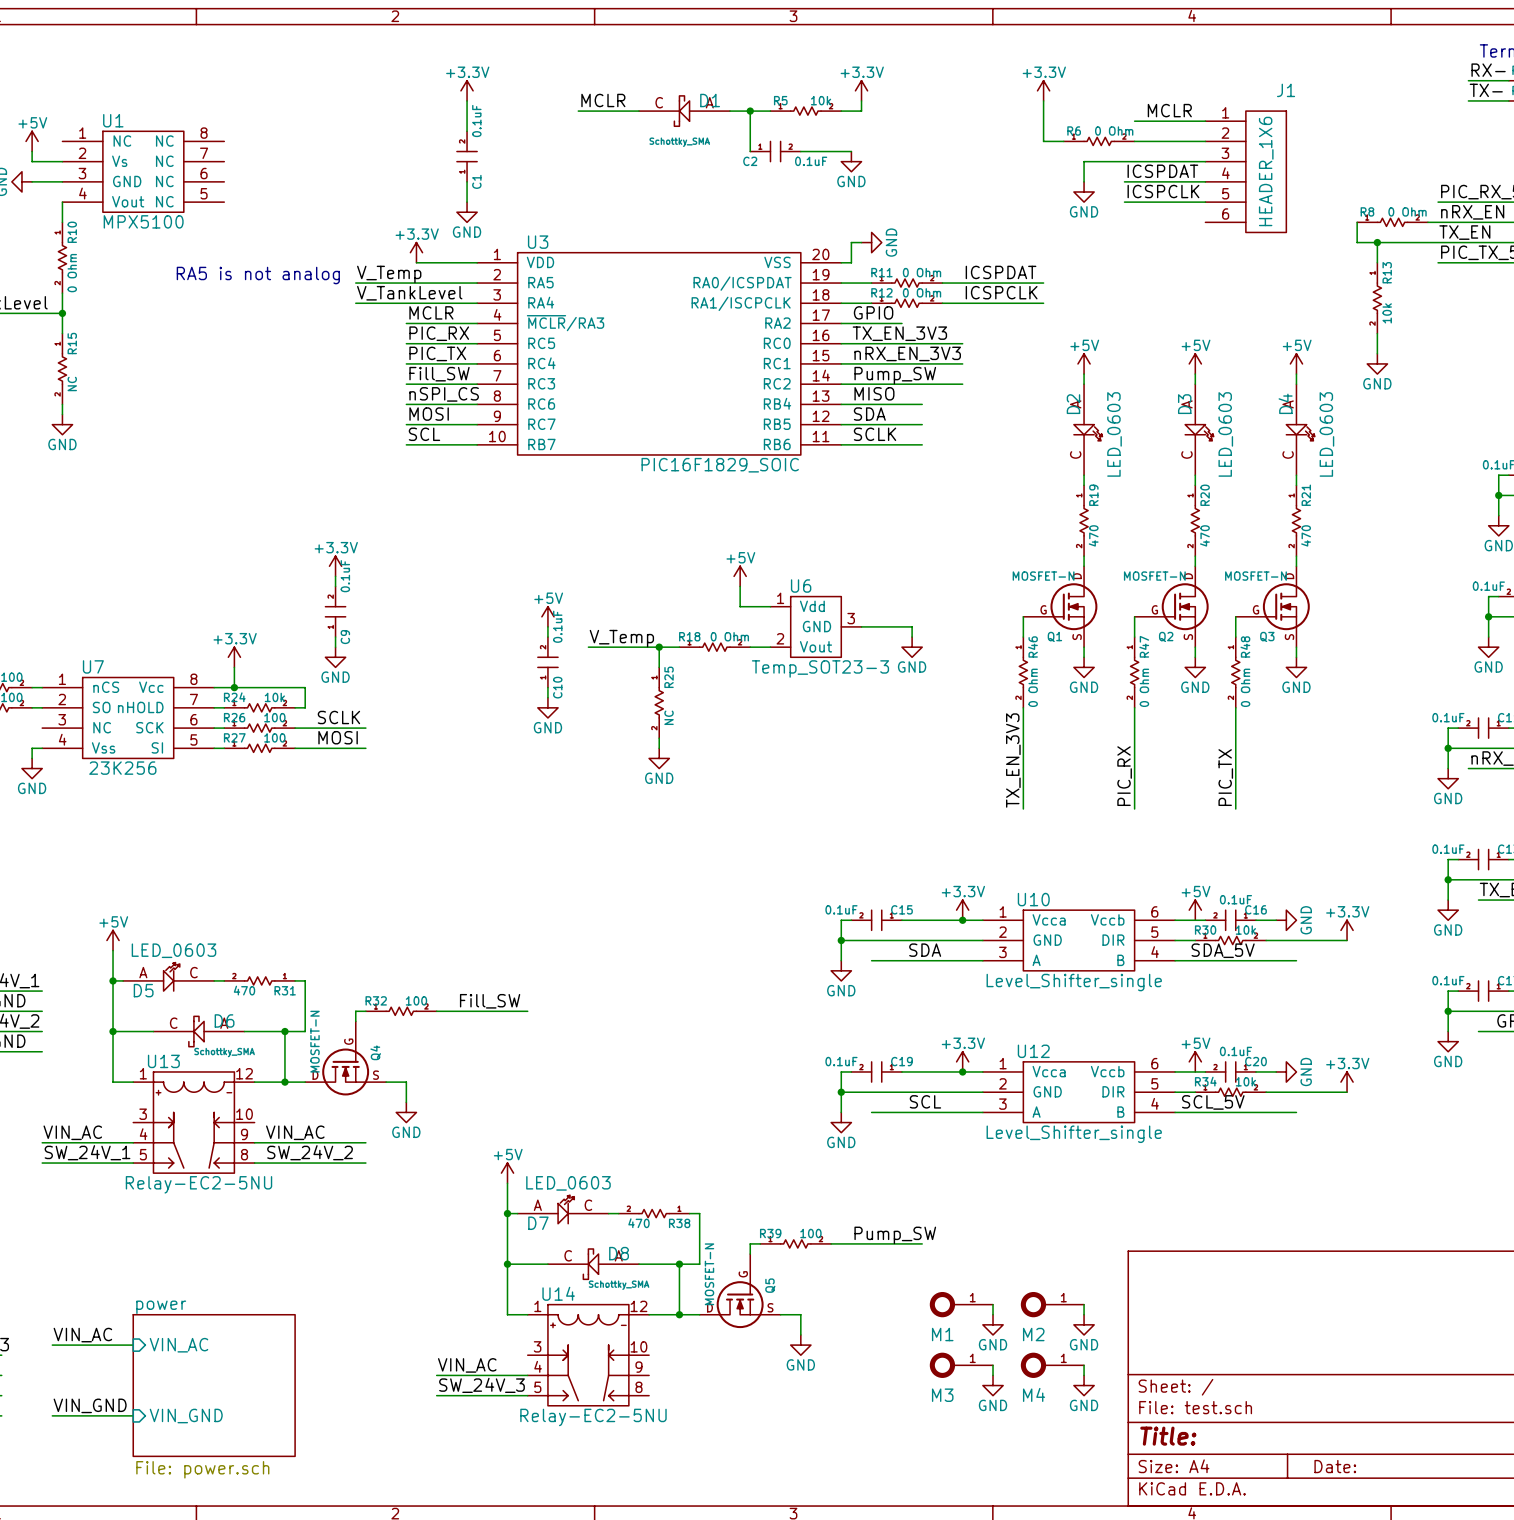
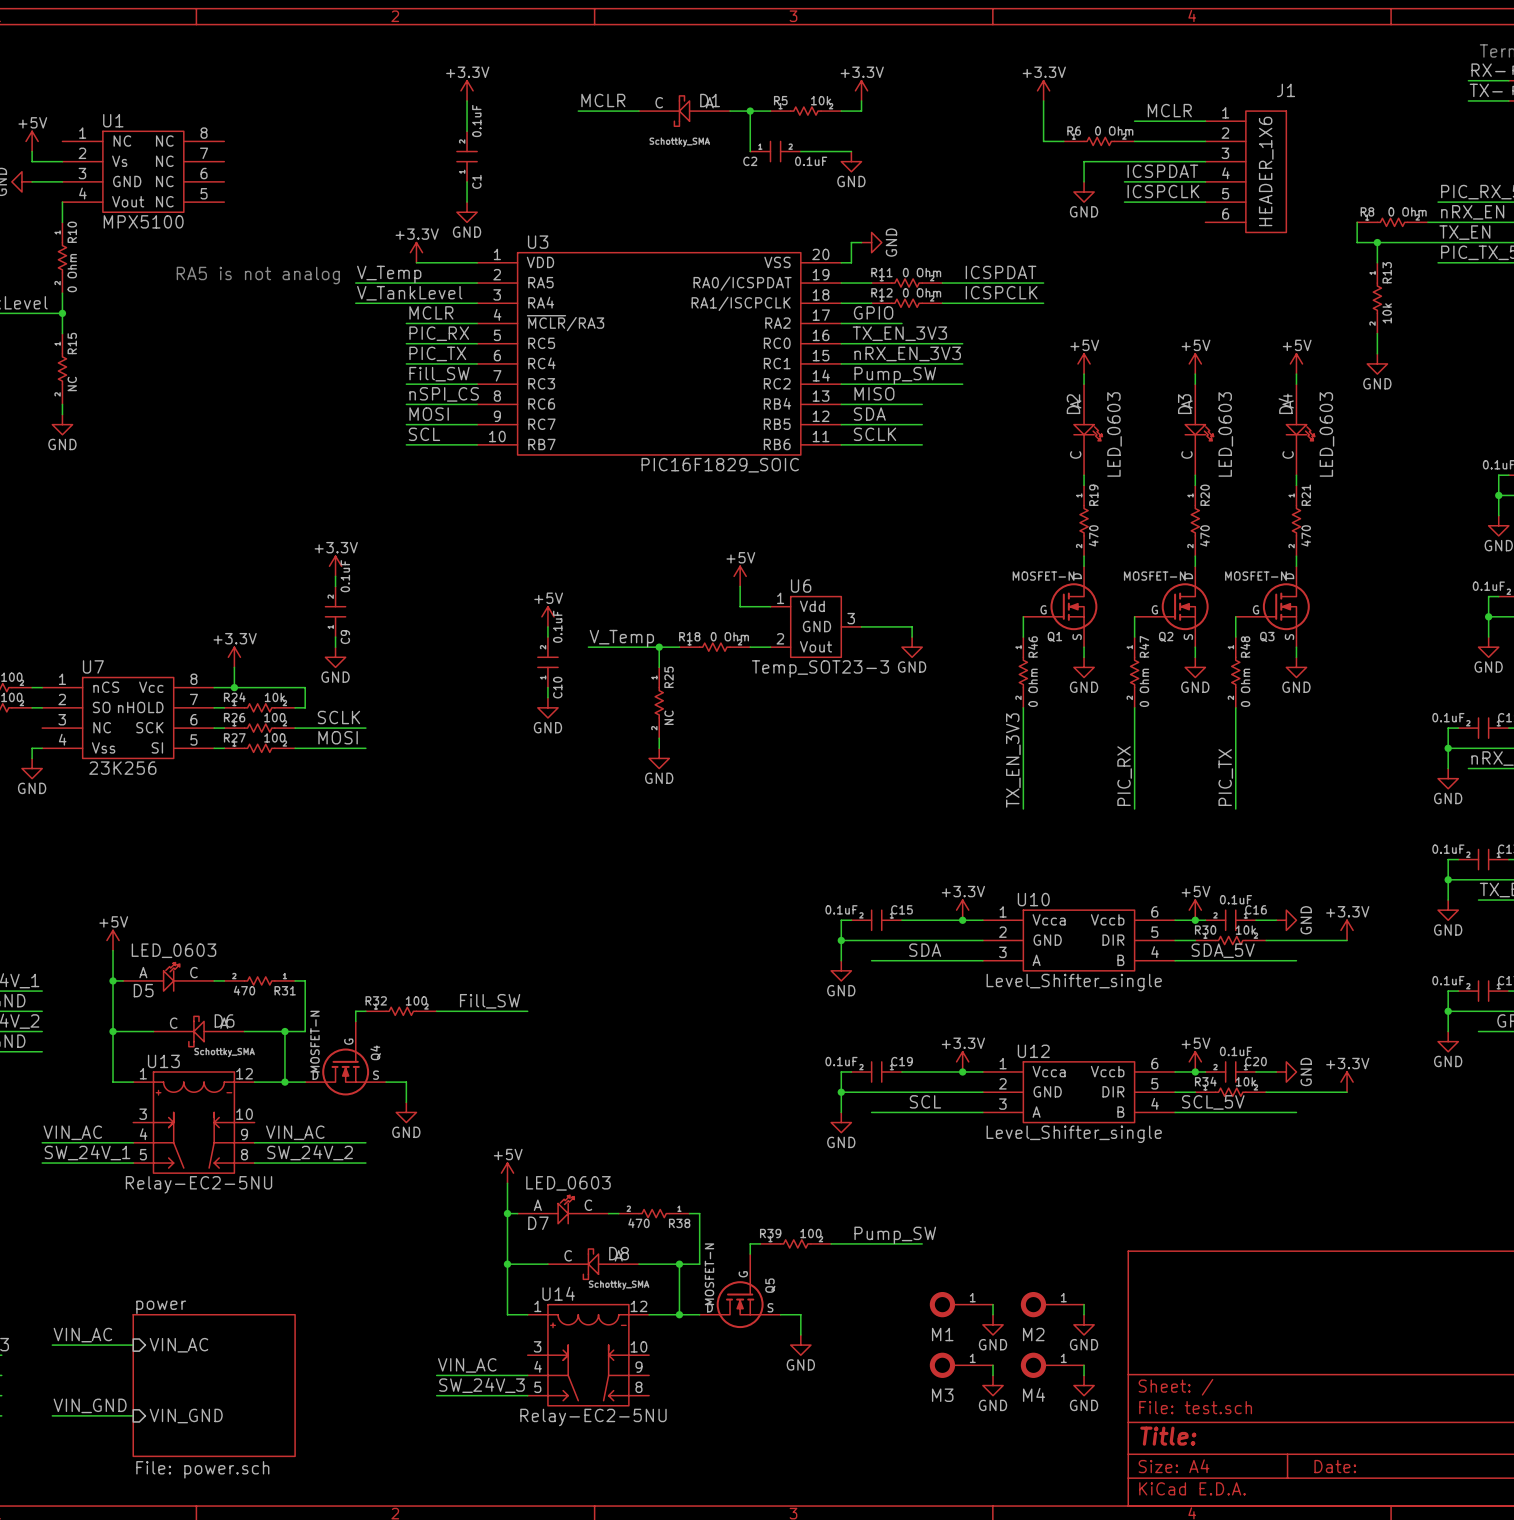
junction: none -> (1195, 920)
junction: none -> (1195, 1071)

